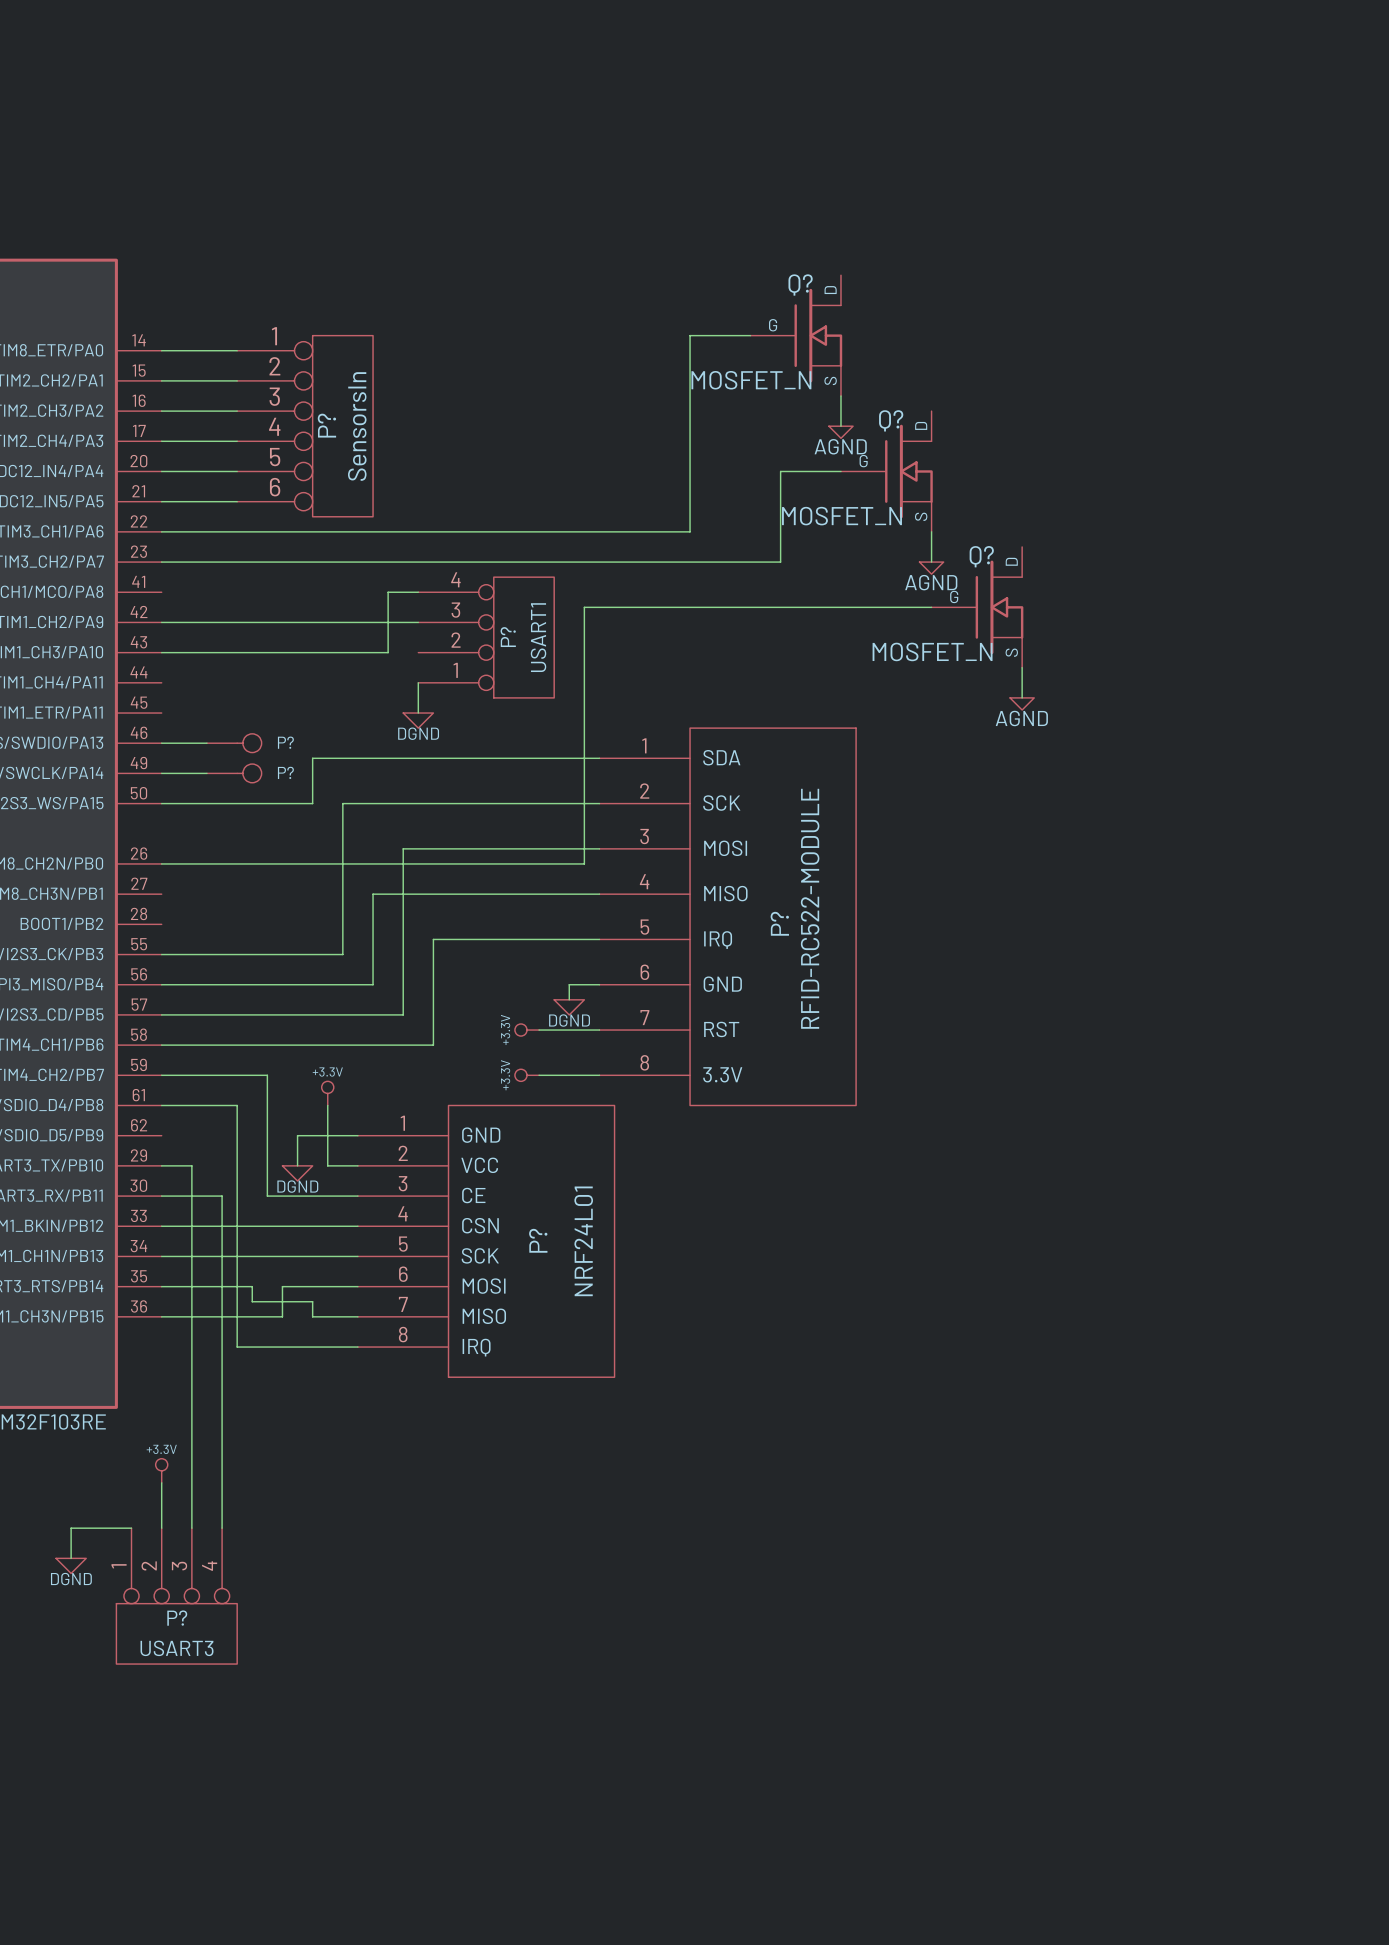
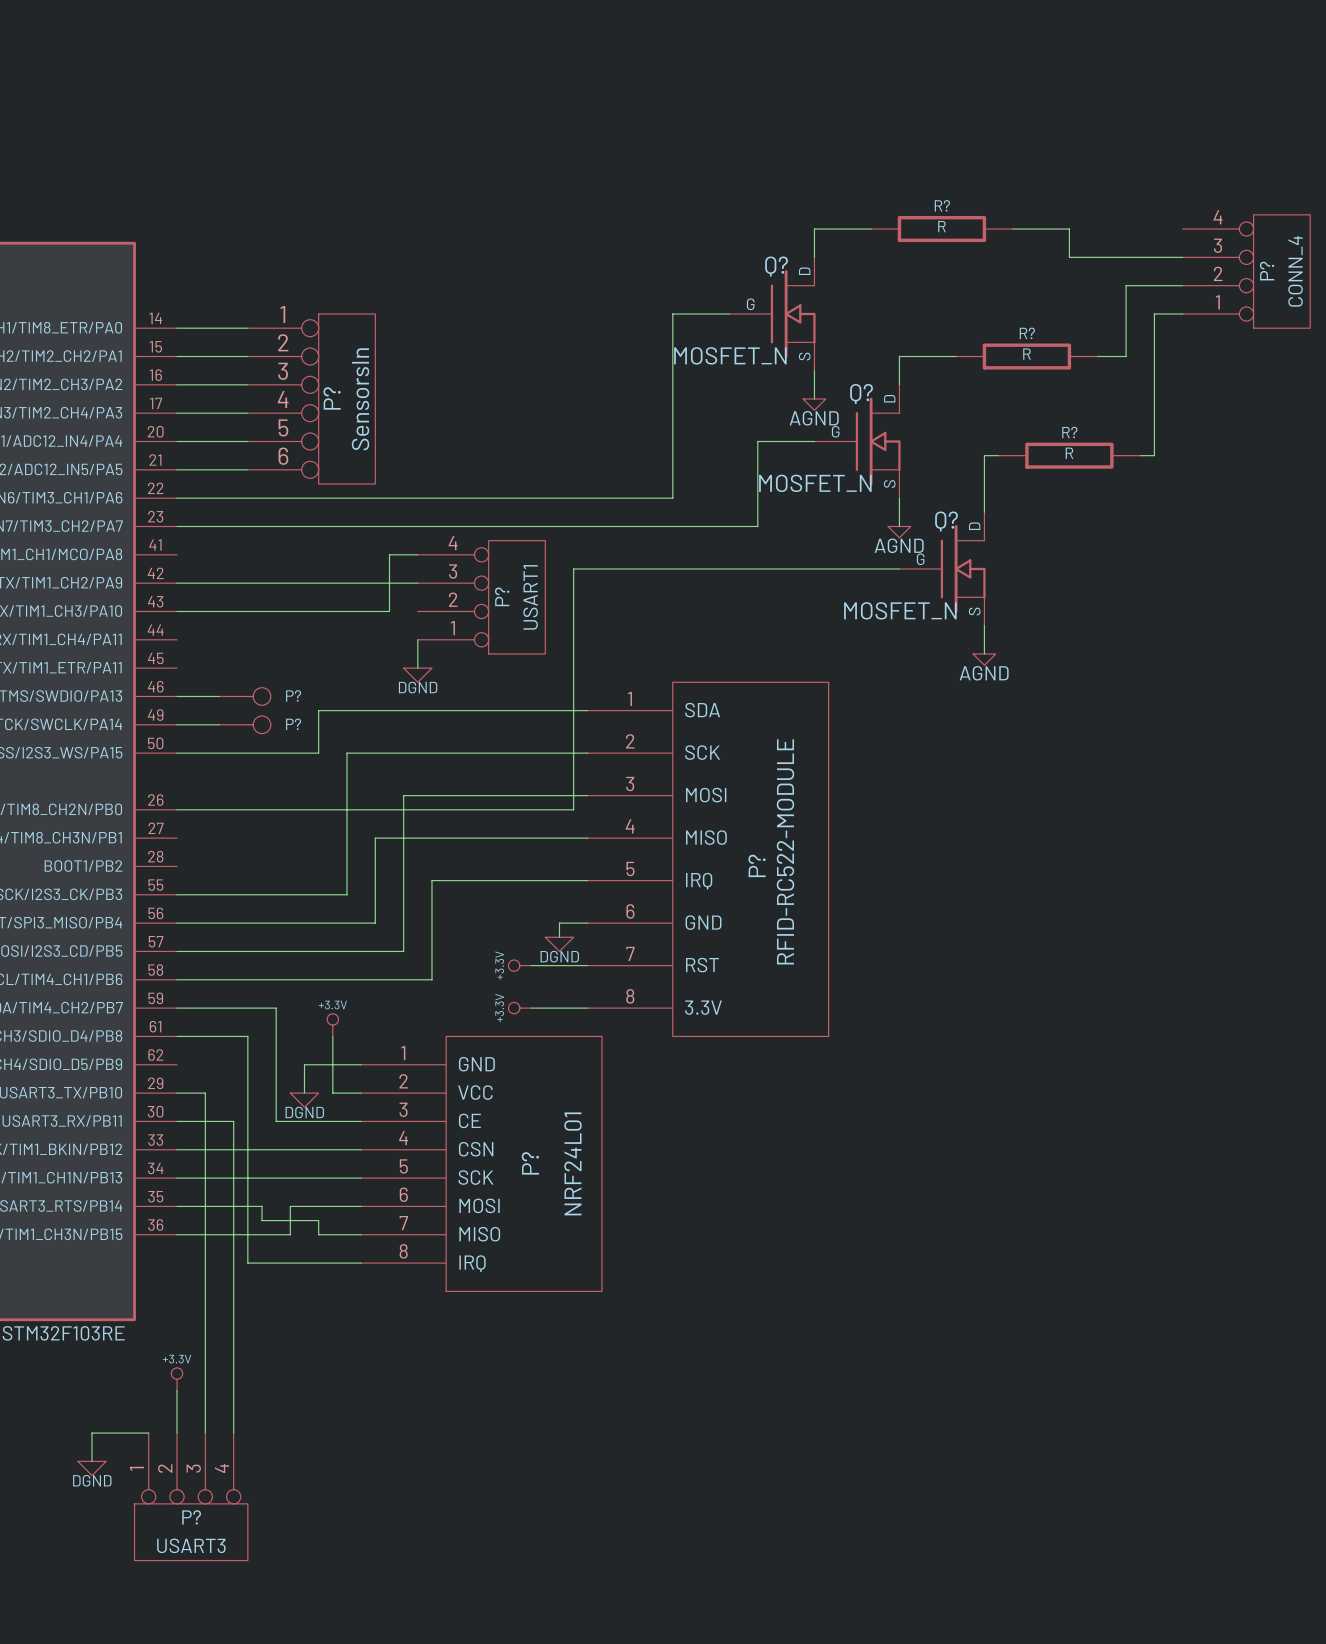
wire: none -> (871, 229) (814, 229) (814, 257)
R?: none -> R (941, 229)
wire: none -> (1012, 229) (1069, 229) (1069, 257) (1182, 257)
P?: none -> CONN_4 (1246, 271)
wire: none -> (1182, 285) (1126, 285) (1126, 356) (1097, 356)
wire: none -> (1182, 314) (1154, 314) (1154, 455) (1140, 455)
wire: none -> (956, 356) (899, 356) (899, 384)
R?: none -> R (1026, 356)
wire: none -> (998, 455) (984, 455) (984, 512)
R?: none -> R (1069, 455)

